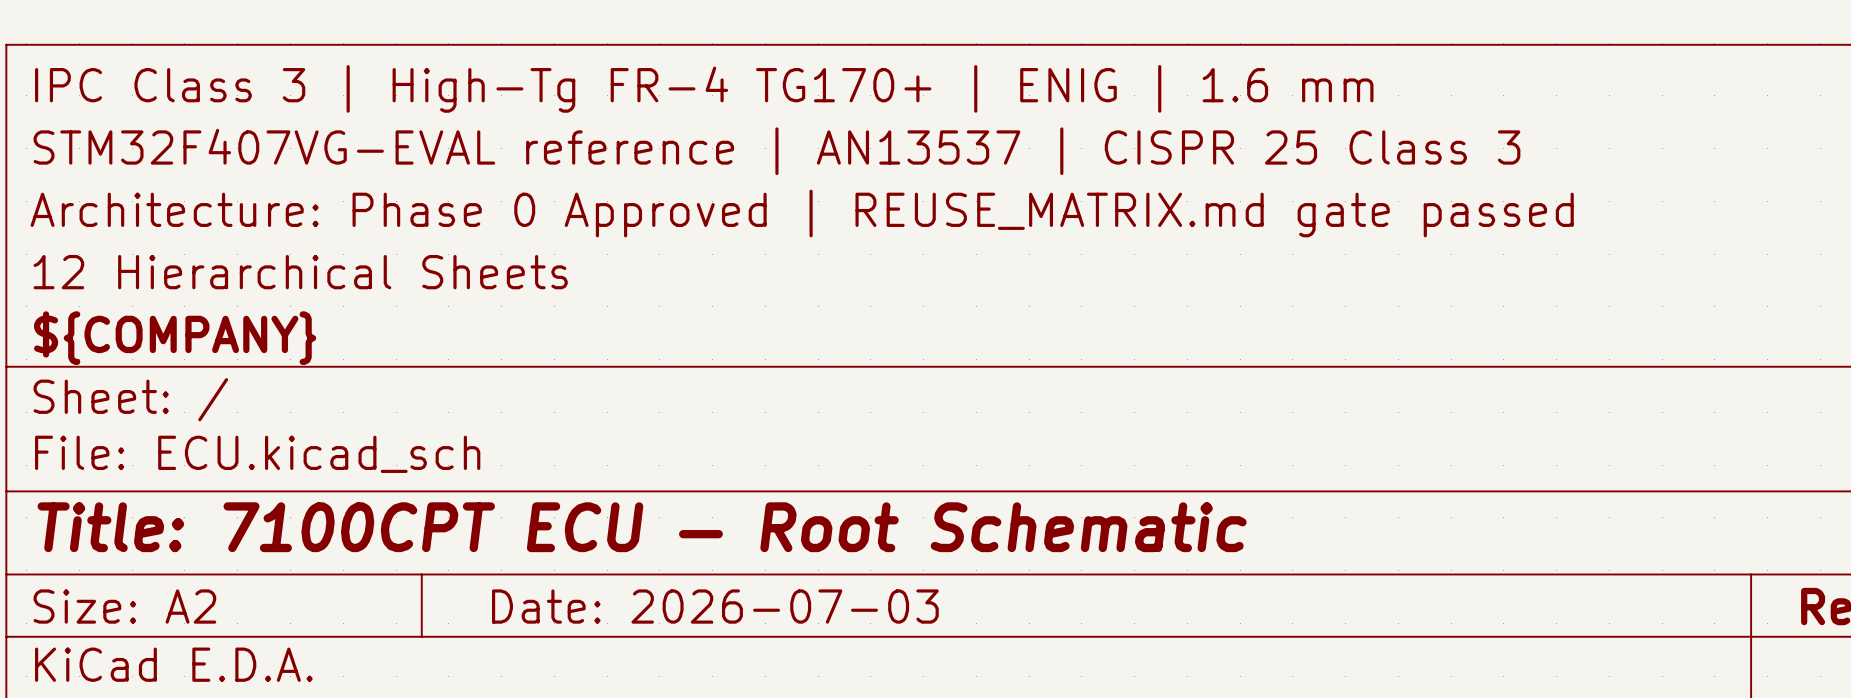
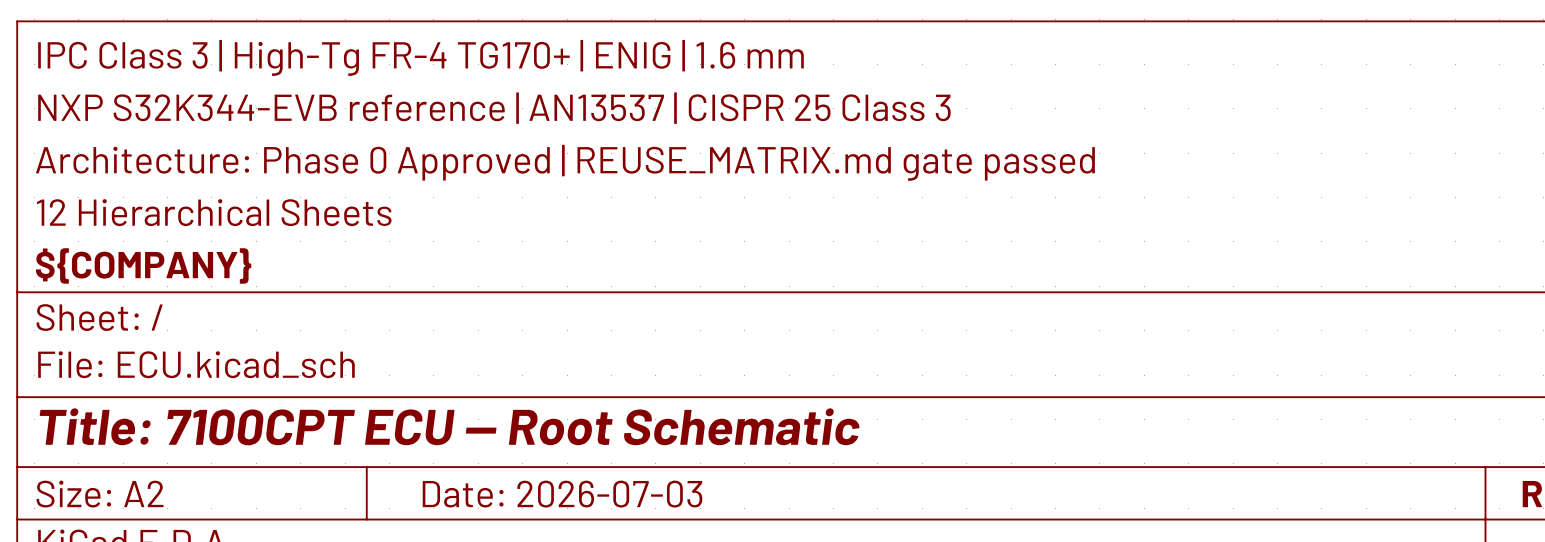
title block: STM32F407VG-EVAL reference | AN13537 | CISPR 25 Class 3 (776, 151) -> NXP S32K344-EVB reference | AN13537 | CISPR 25 Class 3 (494, 108)

